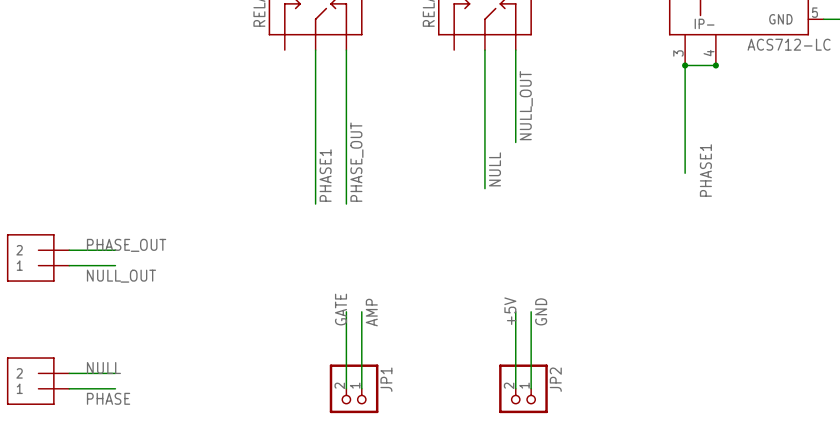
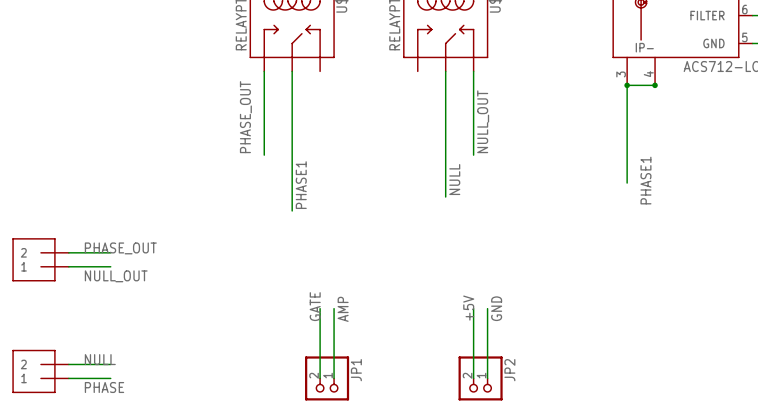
wire: none -> (264, 71) (264, 155)
wire: (346, 50) (346, 204) -> none
label position: PHASE_OUT (356, 162) -> PHASE_OUT (245, 117)

